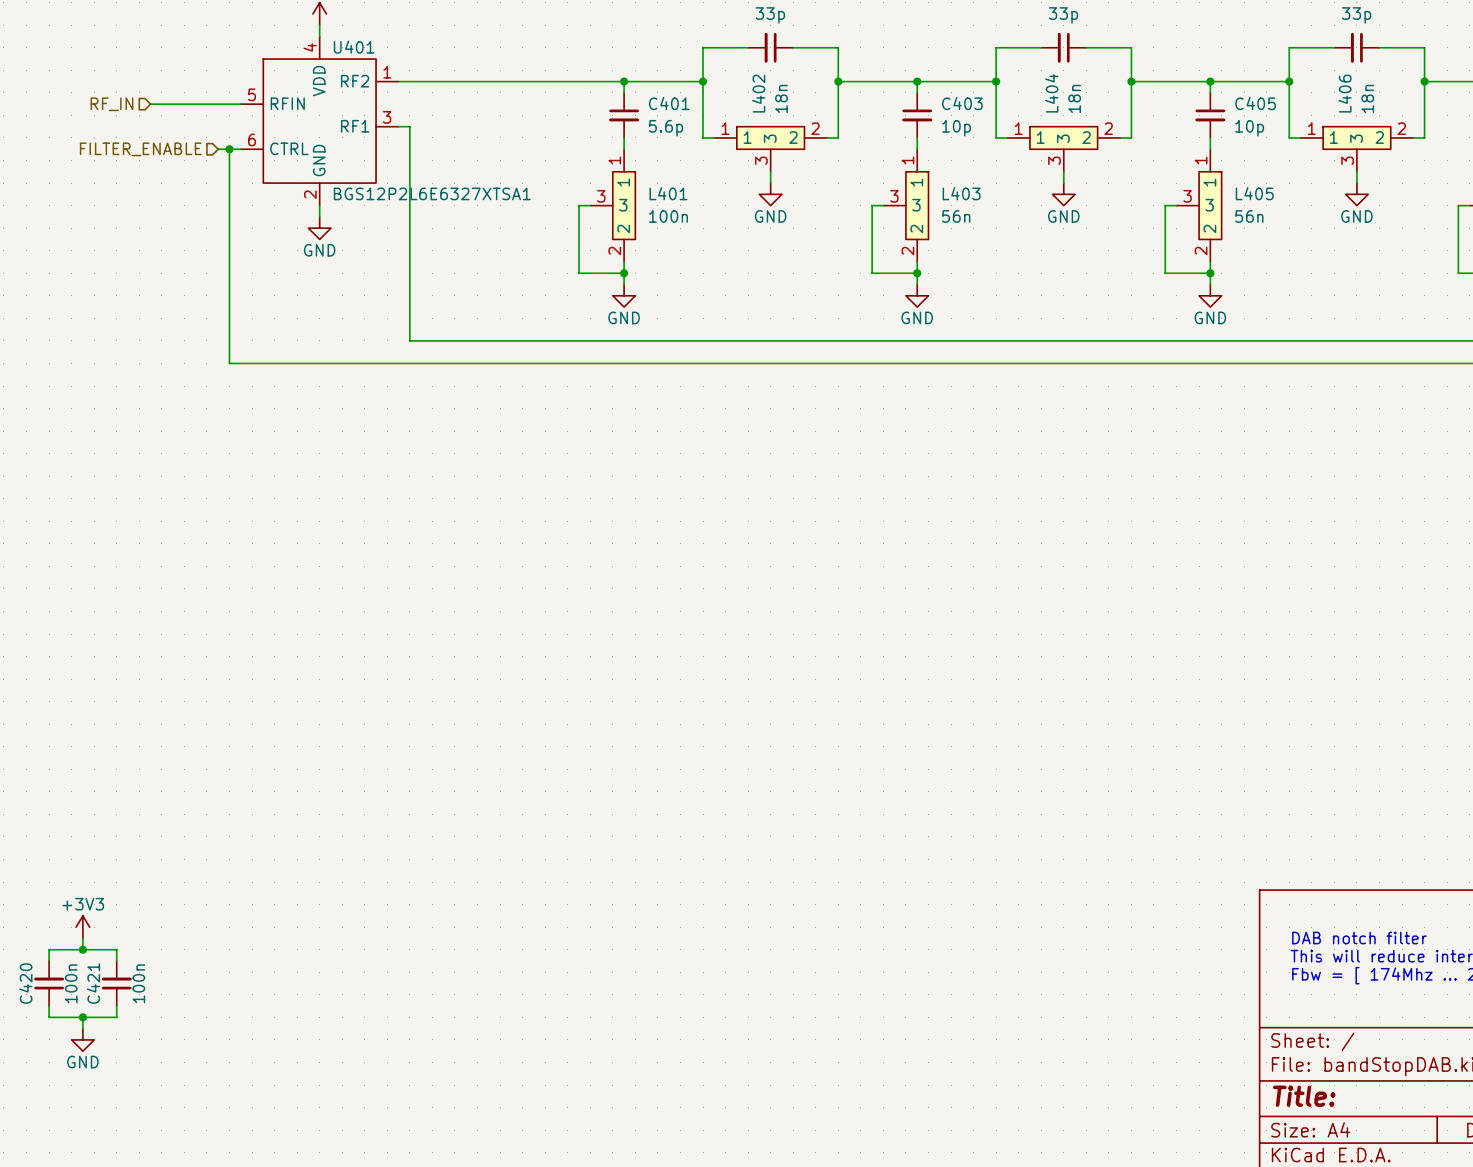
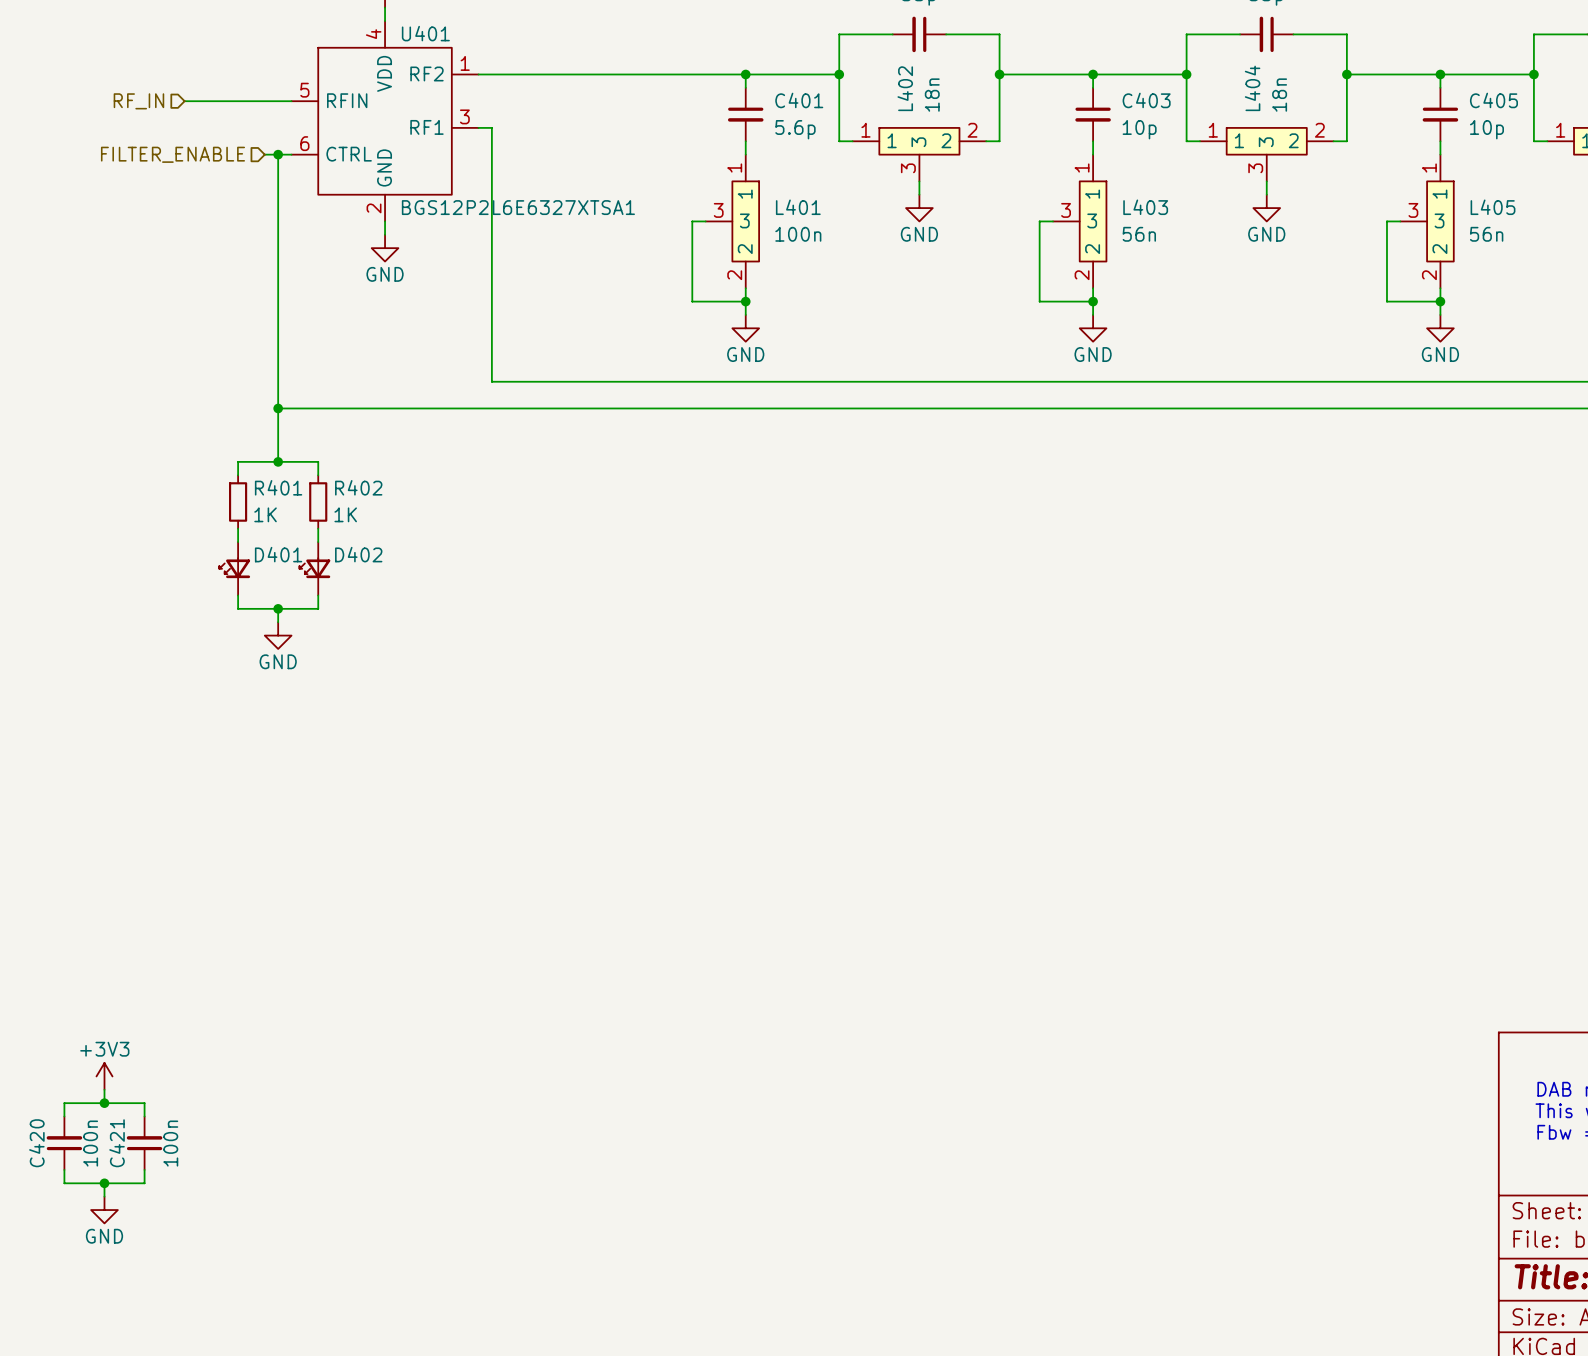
wire: none -> (278, 408) (278, 461)
junction: none -> (278, 408)
junction: none -> (278, 461)
wire: none -> (238, 475) (238, 461) (318, 461) (318, 475)
R401: none -> 1K (238, 501)
R402: none -> 1K (318, 501)
wire: none -> (238, 528) (238, 542)
wire: none -> (318, 528) (318, 542)
D401: none -> (234, 568)
D402: none -> (314, 568)
wire: none -> (238, 595) (238, 608) (318, 608) (318, 595)
wire: none -> (278, 608) (278, 622)
junction: none -> (278, 608)
power symbol: none -> GND (278, 635)

